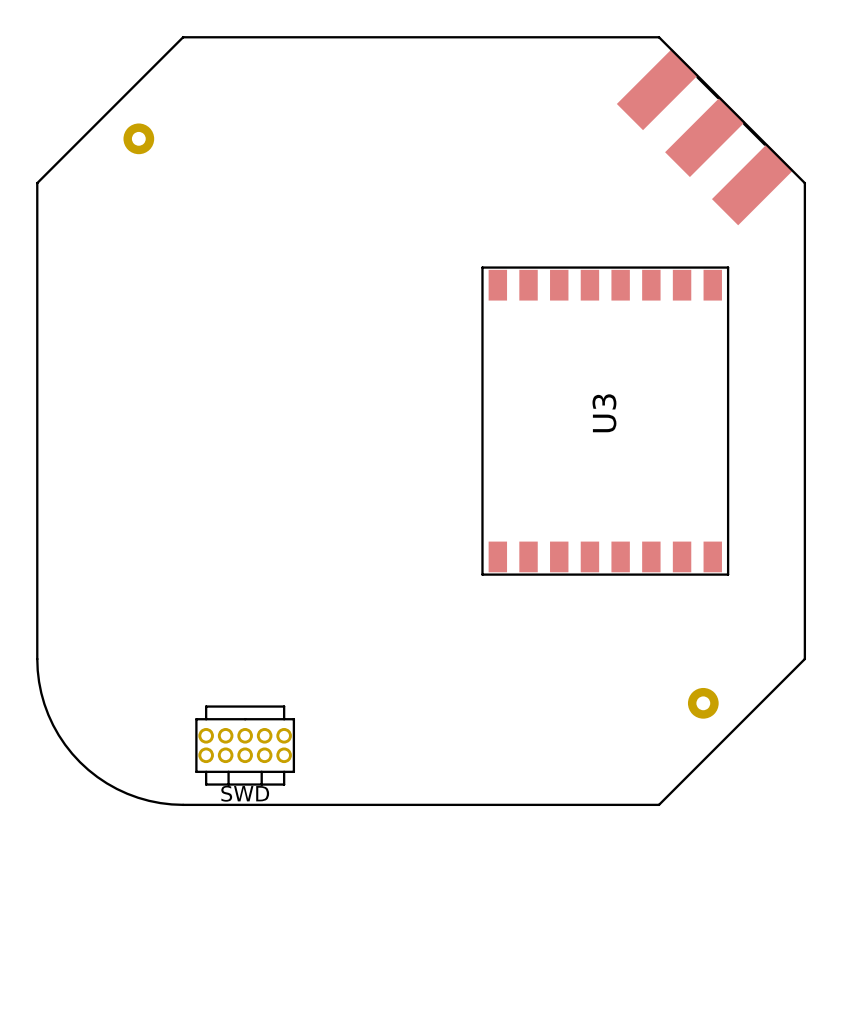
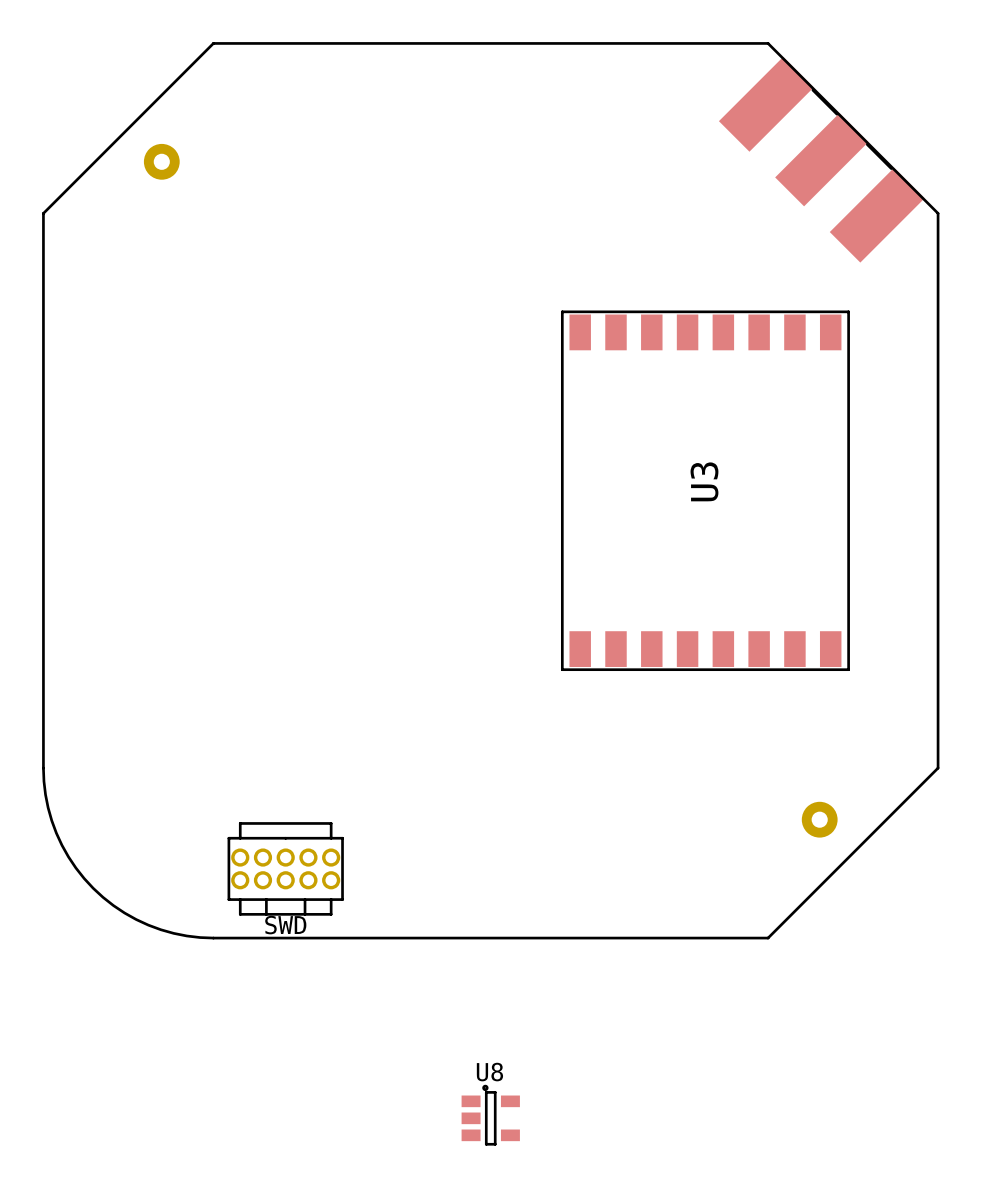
U8: none -> (490, 1115)

